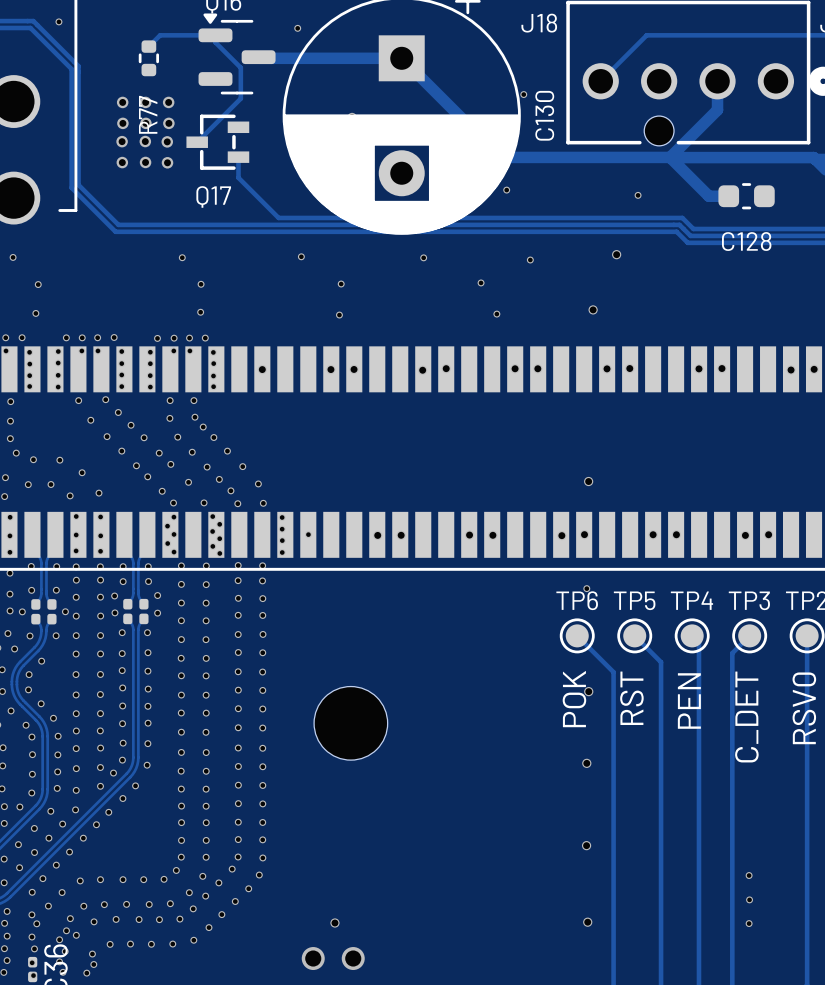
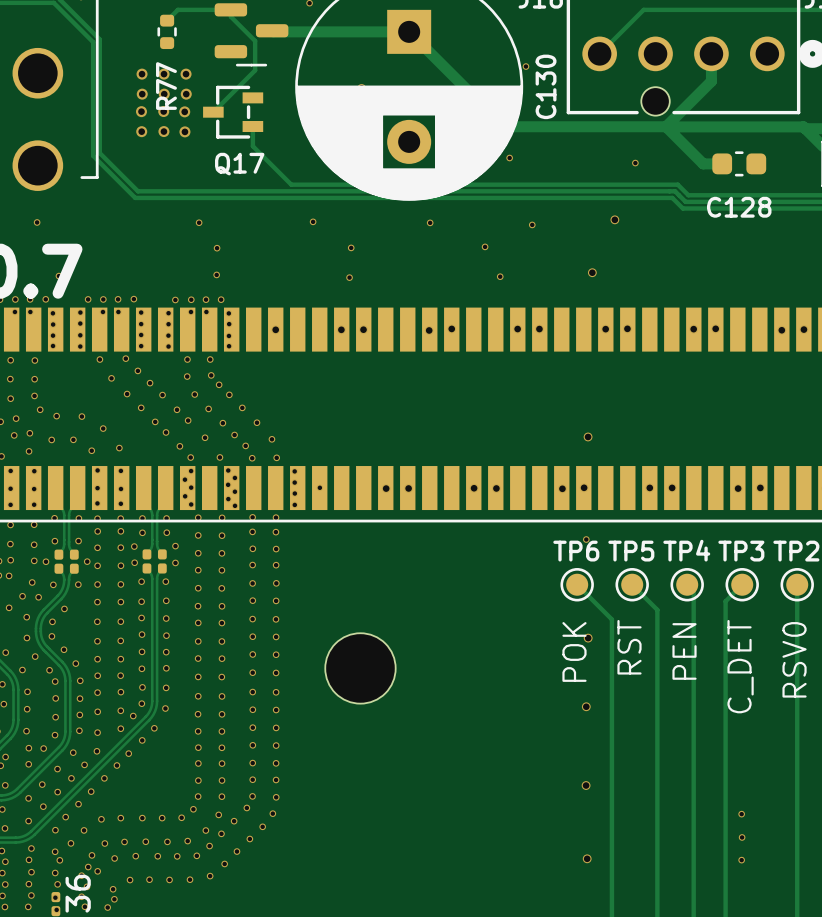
via: (334, 923) -> none
via: (313, 958) -> none
via: (353, 958) -> none

